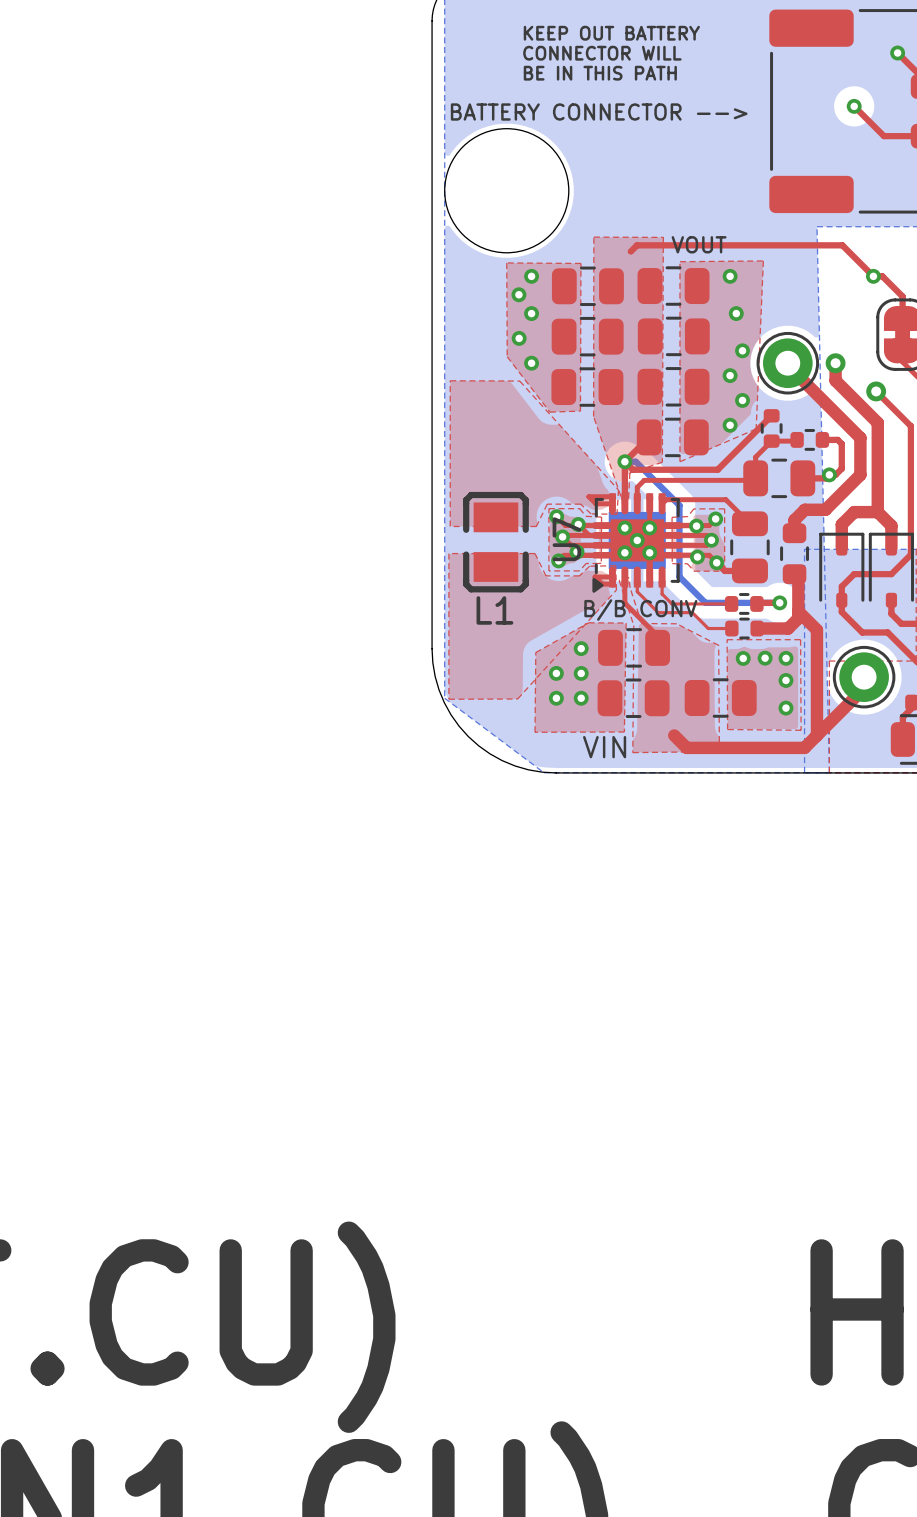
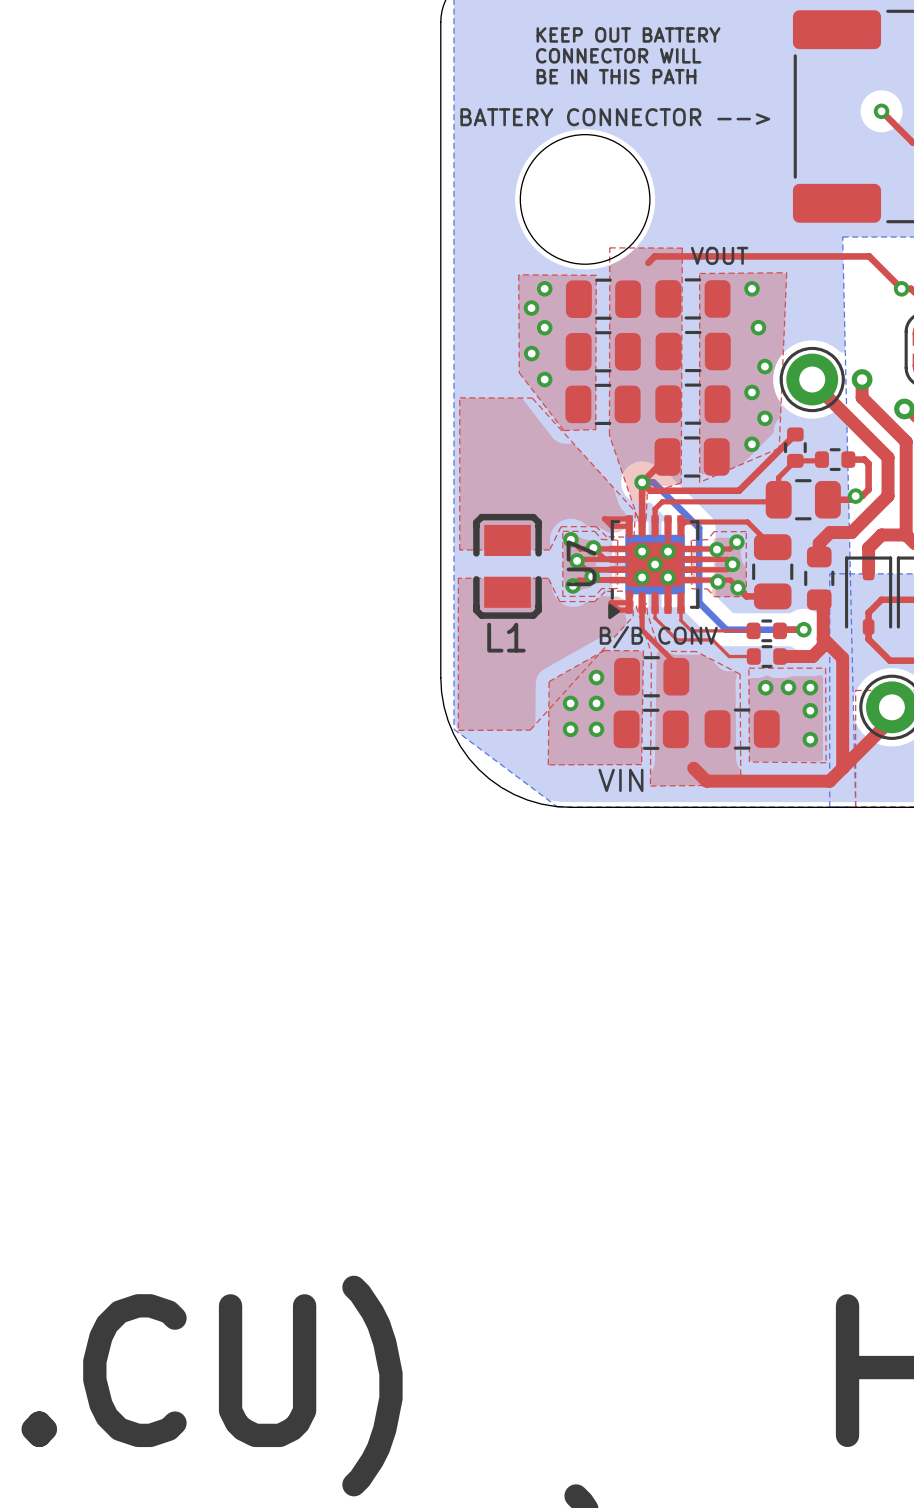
round board edge position: (506, 190) -> (585, 199)

